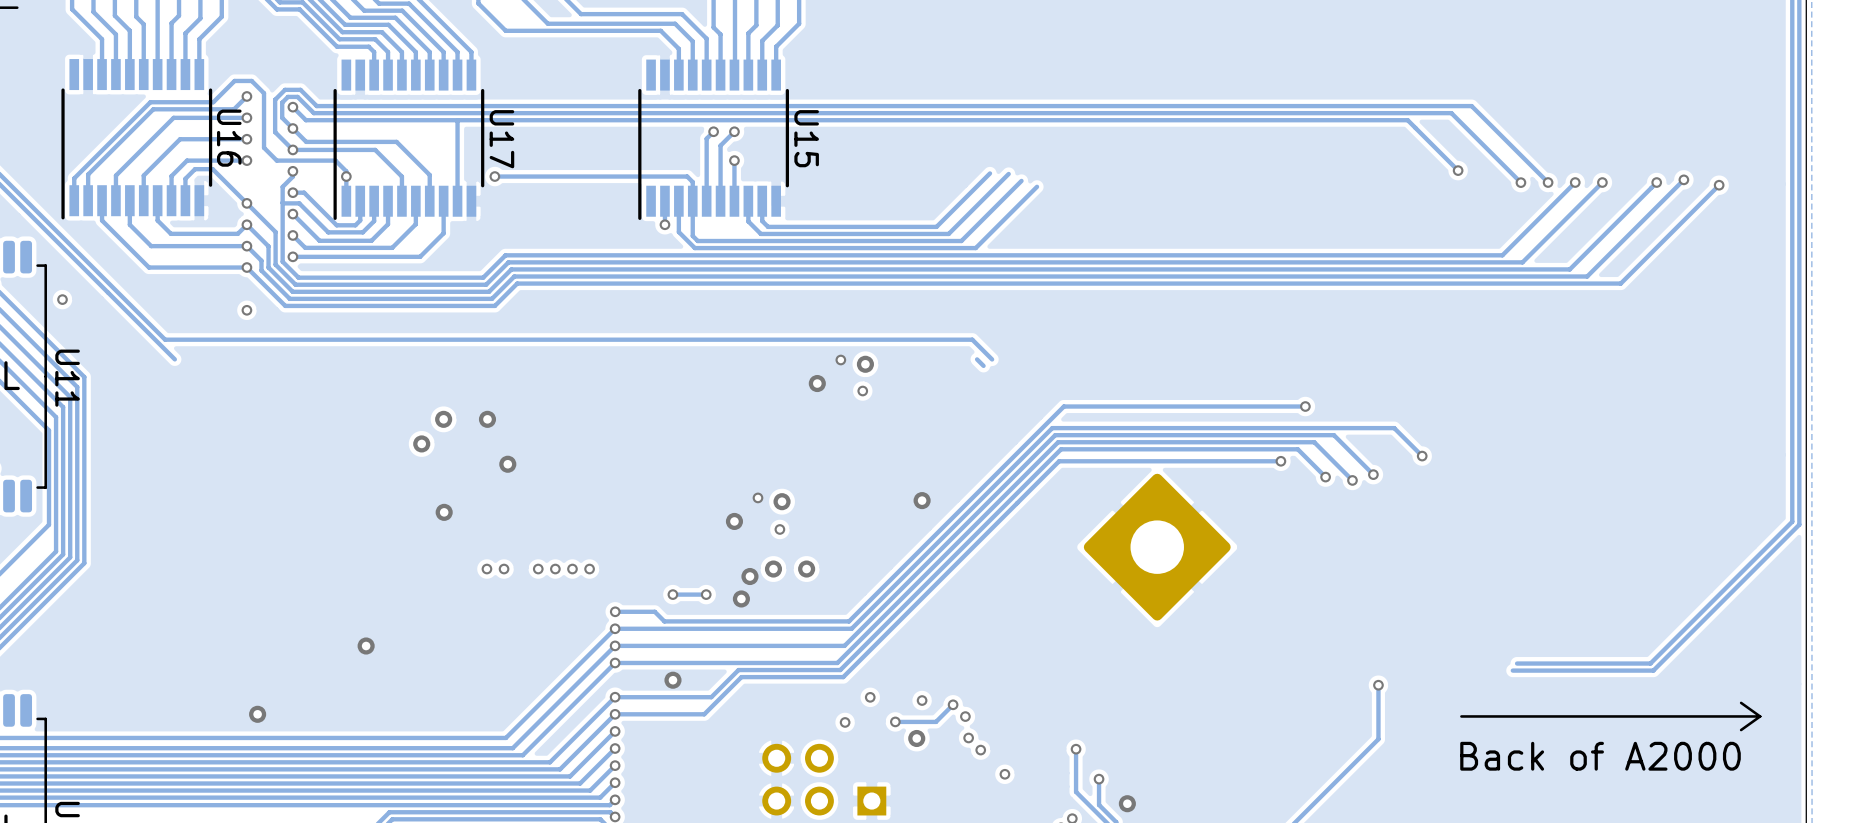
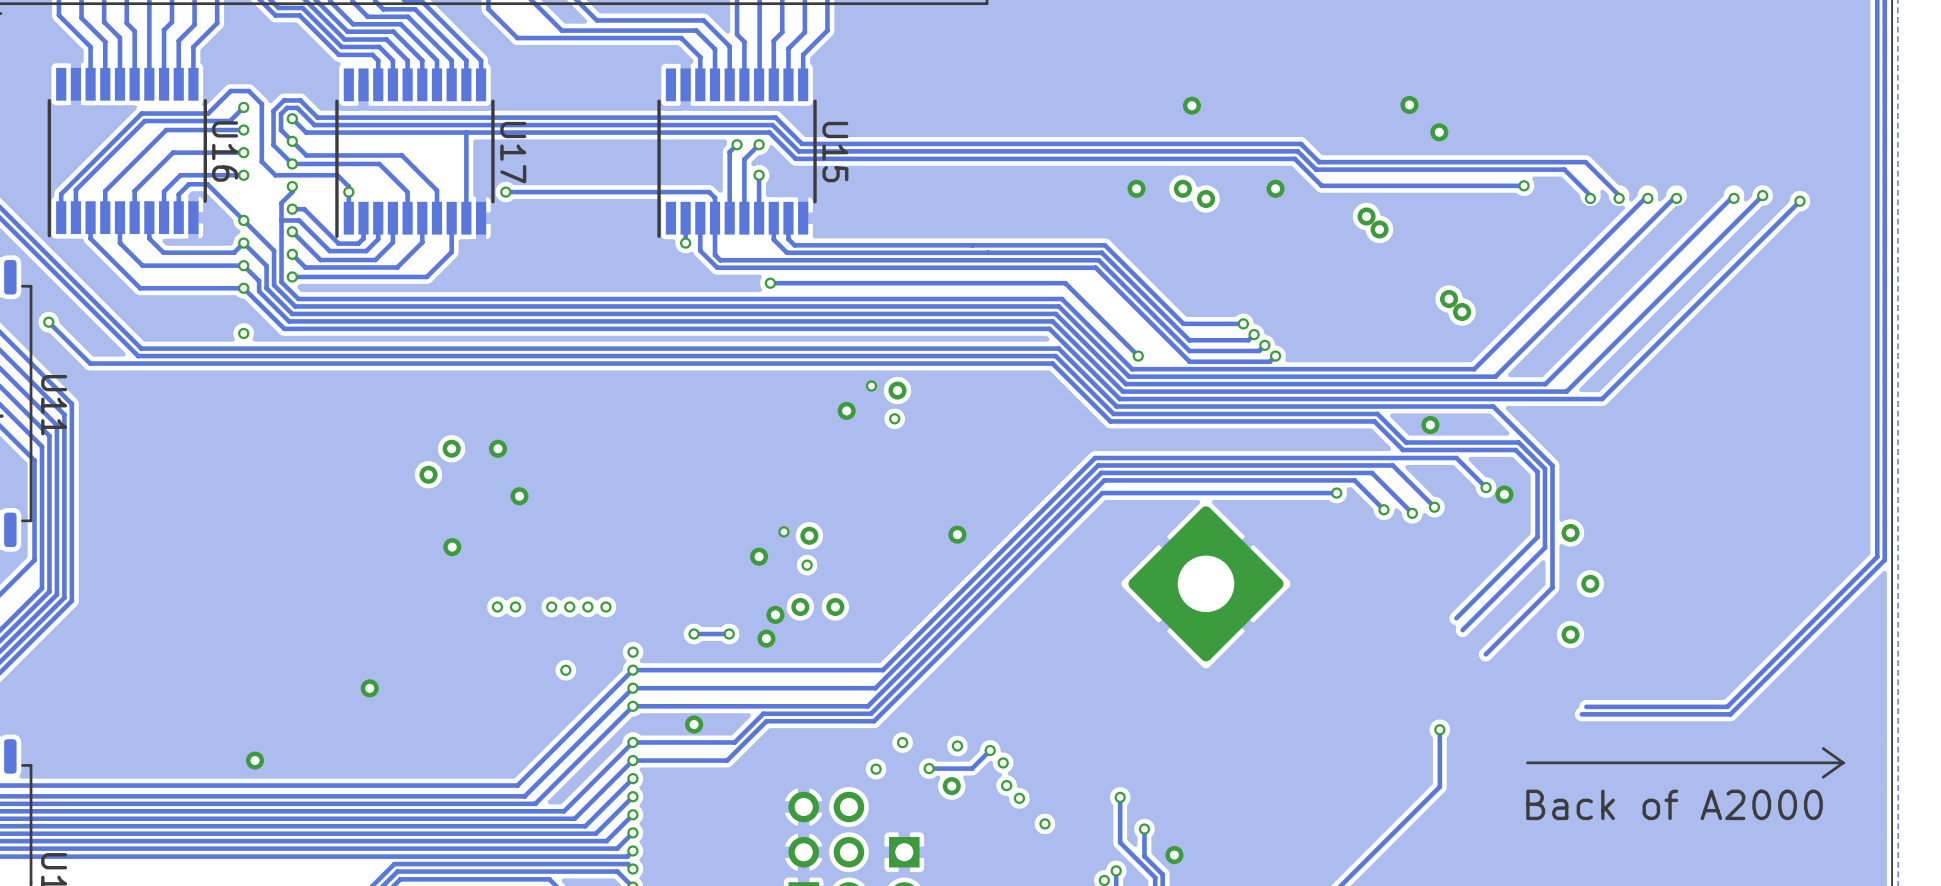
via: none -> (1191, 105)
via: none -> (1409, 104)
track: (750, 106) (1471, 106) (1548, 182) -> (775, 117) (801, 143) (1300, 143) (1319, 162) (1585, 162) (1619, 195)
track: (747, 113) (1451, 113) (1520, 182) -> (772, 125) (798, 151) (1297, 151) (1316, 169) (1564, 169) (1590, 195)
via: none -> (1439, 132)
track: (744, 120) (1407, 120) (1458, 170) -> (769, 132) (795, 158) (1294, 158) (1321, 185) (1524, 185)
track: (989, 173) (936, 226) -> (1243, 323) (1183, 323) (1104, 245) (972, 245)
track: (1008, 173) (948, 233) -> (1254, 334) (1248, 340) (1189, 340) (1101, 252) (985, 252)
via: none -> (1136, 188)
via: none -> (1182, 188)
via: none -> (1275, 188)
track: (1021, 180) (961, 241) -> (1264, 345) (1259, 350) (1189, 350) (1098, 260) (999, 260)
track: (1575, 182) (1502, 255) (505, 255) (483, 277) -> (1647, 195) (1474, 369) (1132, 369) (1061, 299) (493, 299)
track: (1602, 182) (1522, 262) (508, 262) (486, 284) -> (1676, 195) (1495, 376) (1129, 376) (1058, 306) (496, 306)
track: (1656, 182) (1569, 269) (511, 269) (489, 291) -> (1733, 195) (1545, 384) (1125, 384) (1055, 313) (499, 313)
via: none -> (1206, 198)
track: (1037, 186) (975, 248) -> (1275, 356) (1269, 361) (1189, 361) (1095, 267) (1014, 267)
via: none -> (1366, 216)
via: none -> (1379, 229)
track: none -> (770, 283) (1065, 283) (1138, 356)
via: none -> (770, 283)
track: (1587, 276) (514, 276) (491, 298) -> (1660, 297) (1566, 391) (1122, 391) (1052, 321) (502, 321)
via: none -> (1449, 299)
track: (1620, 283) (517, 283) (494, 305) -> (1695, 305) (1602, 399) (1119, 399) (1049, 328) (505, 328)
via: none -> (1462, 312)
track: none -> (48, 322) (90, 363) (1052, 363) (1110, 421) (1374, 421) (1403, 450) (1515, 450) (1537, 471) (1537, 537) (1456, 618)
via: none -> (1243, 323)
via: none -> (1254, 334)
via: none -> (1264, 345)
track: (150, 324) (165, 339) (972, 339) (992, 359) -> (141, 348) (1058, 348) (1116, 406) (1493, 406) (1552, 465) (1552, 587) (1485, 654)
track: (147, 331) (174, 359) -> (138, 356) (1055, 356) (1113, 413) (1377, 413) (1406, 442) (1518, 442) (1545, 468) (1545, 547) (1462, 630)
via: none -> (1138, 356)
via: none -> (1275, 356)
track: (977, 359) (983, 365) -> none
via: none -> (1430, 425)
track: (1305, 406) (1063, 406) (849, 621) (664, 621) (654, 611) (615, 611) -> none
via: (1305, 406) -> none
via: none -> (1504, 494)
via: none -> (1570, 532)
via: none -> (1590, 583)
via: none -> (1570, 634)
via: none -> (565, 670)

